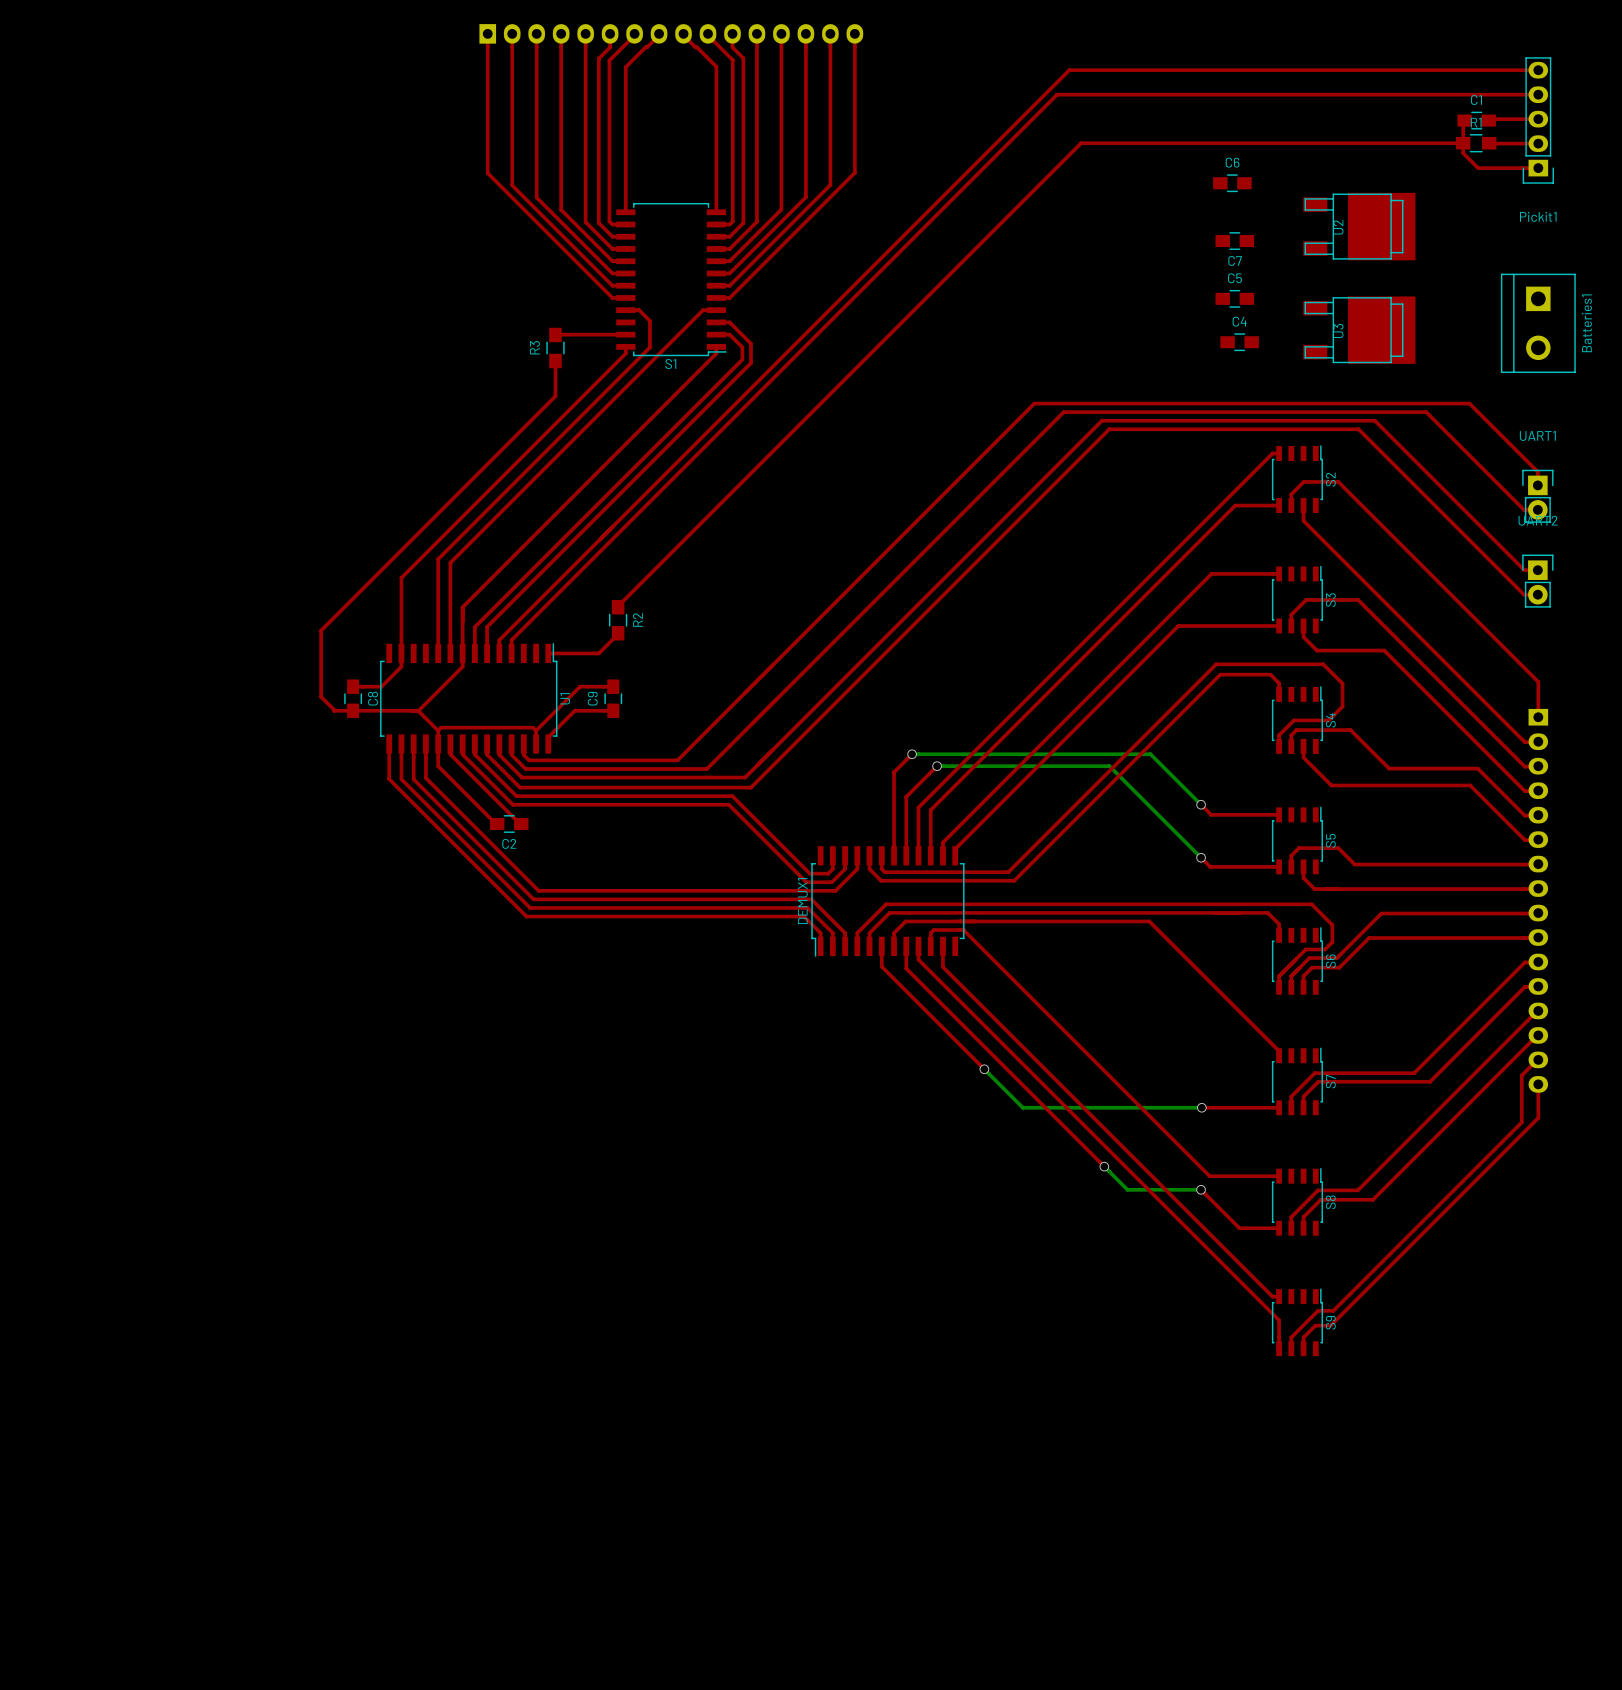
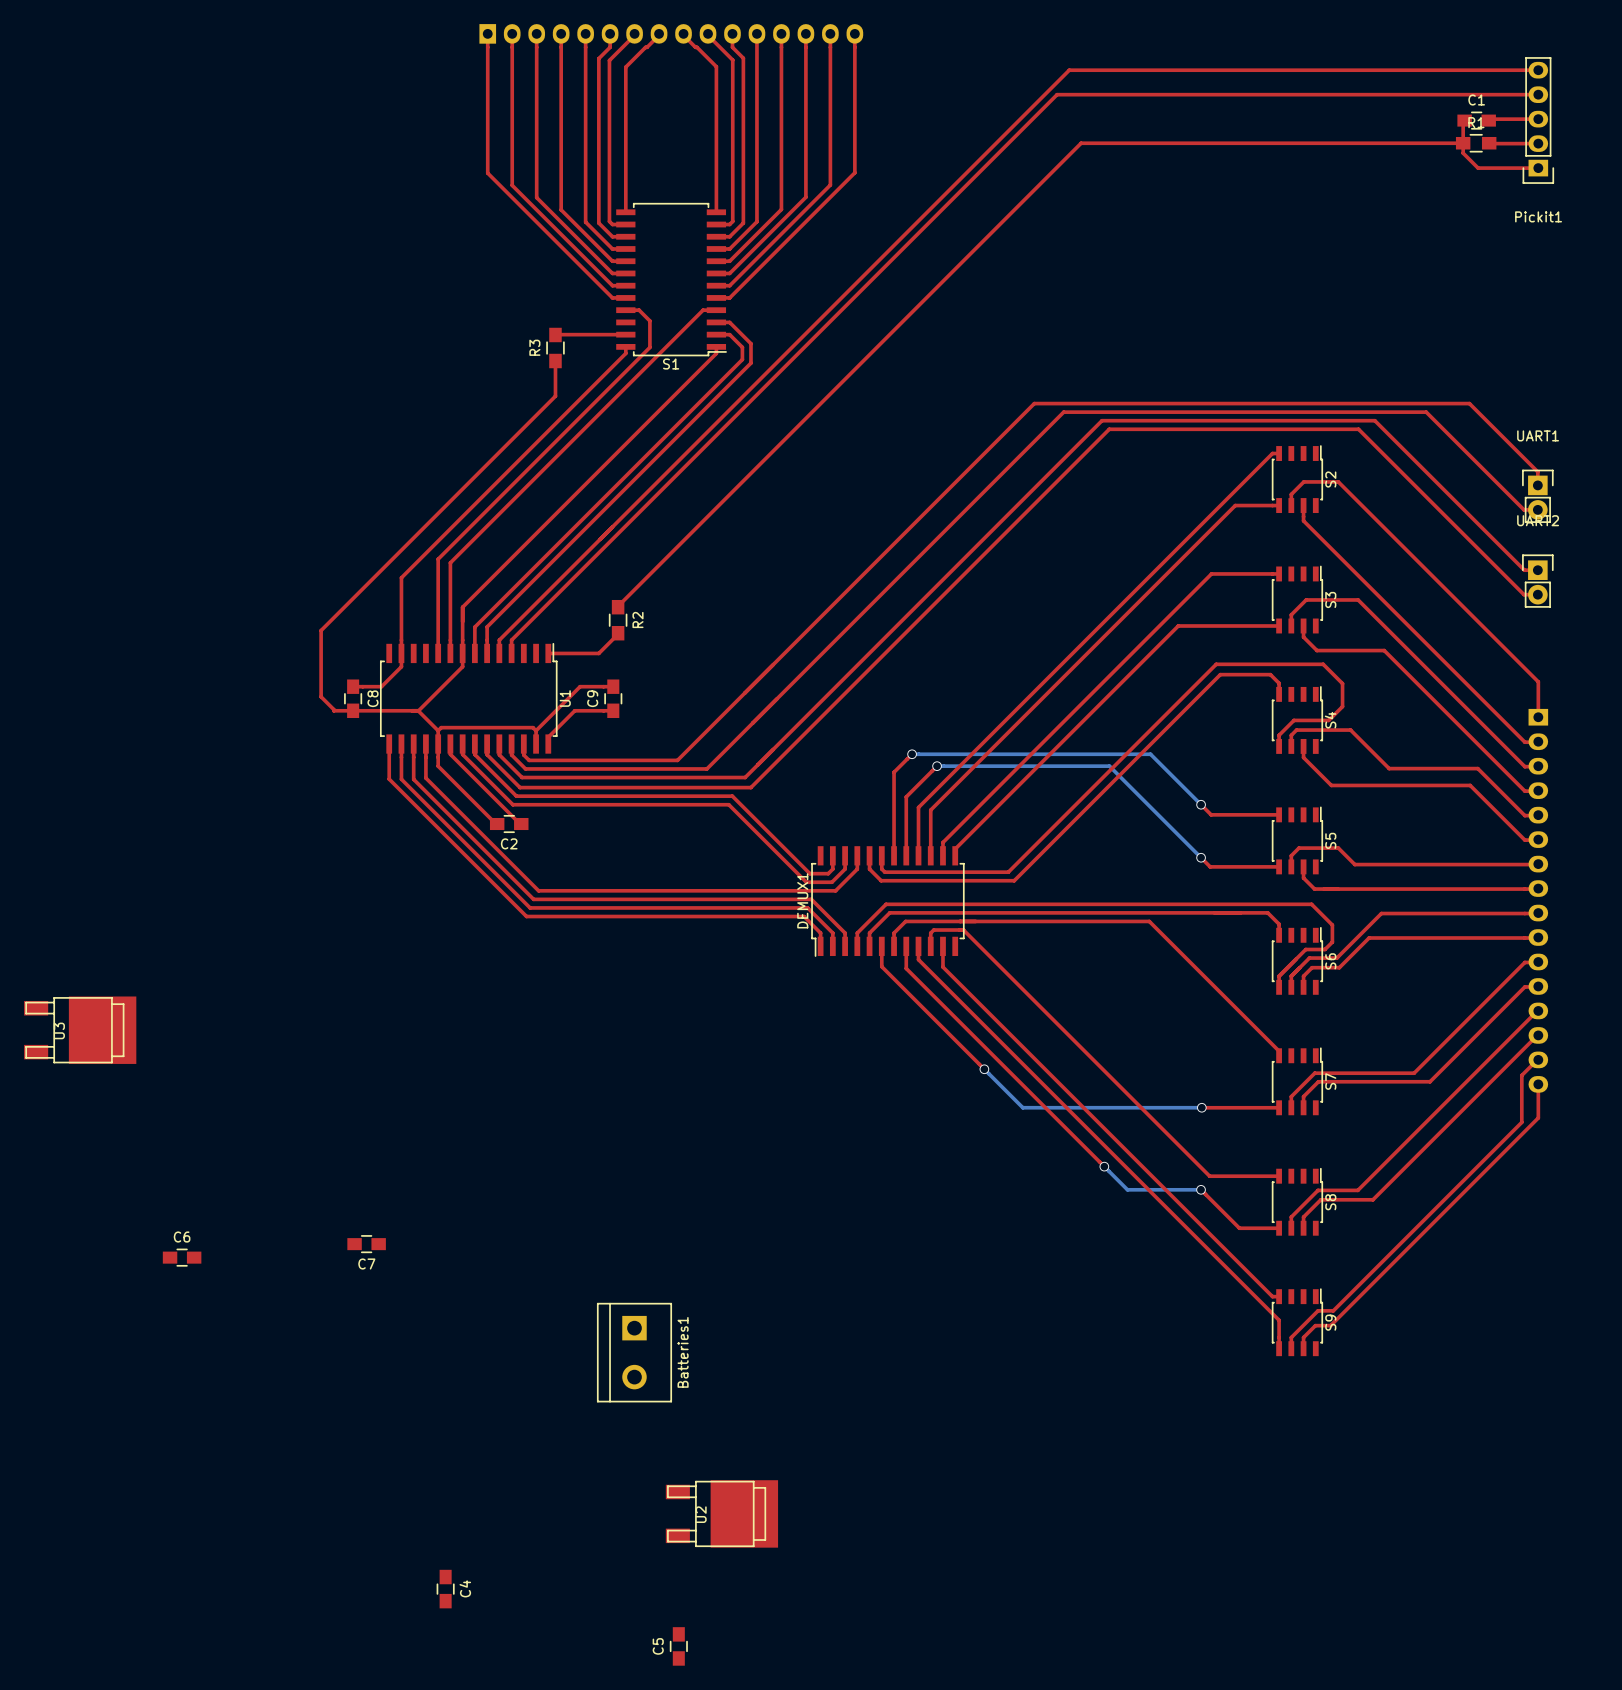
C6 position: (1232, 183) -> (182, 1257)
U2 position: (1359, 226) -> (721, 1513)
C7 position: (1234, 241) -> (366, 1244)
C5 name position: C5 (1234, 278) -> C5 (658, 1646)
C5 rotation: 0° (1234, 298) -> 90° clockwise (678, 1646)
C5 position: (1234, 298) -> (678, 1646)
Batteries1 position: (1538, 323) -> (634, 1352)
U3 position: (1359, 330) -> (80, 1030)
C4 rotation: 0° (1239, 342) -> 90° clockwise (445, 1589)
C4 position: (1239, 342) -> (445, 1589)

